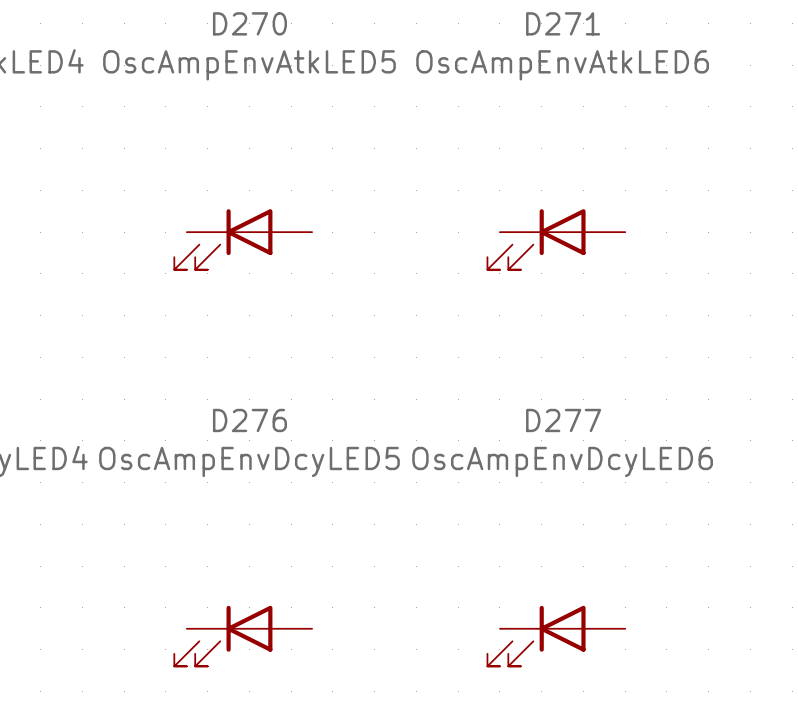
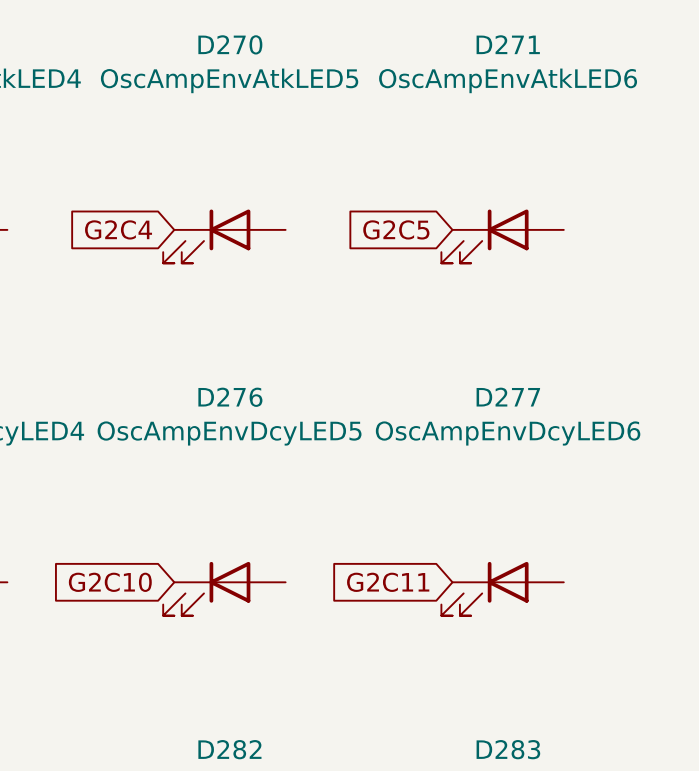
global label: none -> G2C4 (118, 229)
global label: none -> G2C5 (396, 229)
global label: none -> G2C10 (110, 582)
global label: none -> G2C11 (388, 582)

